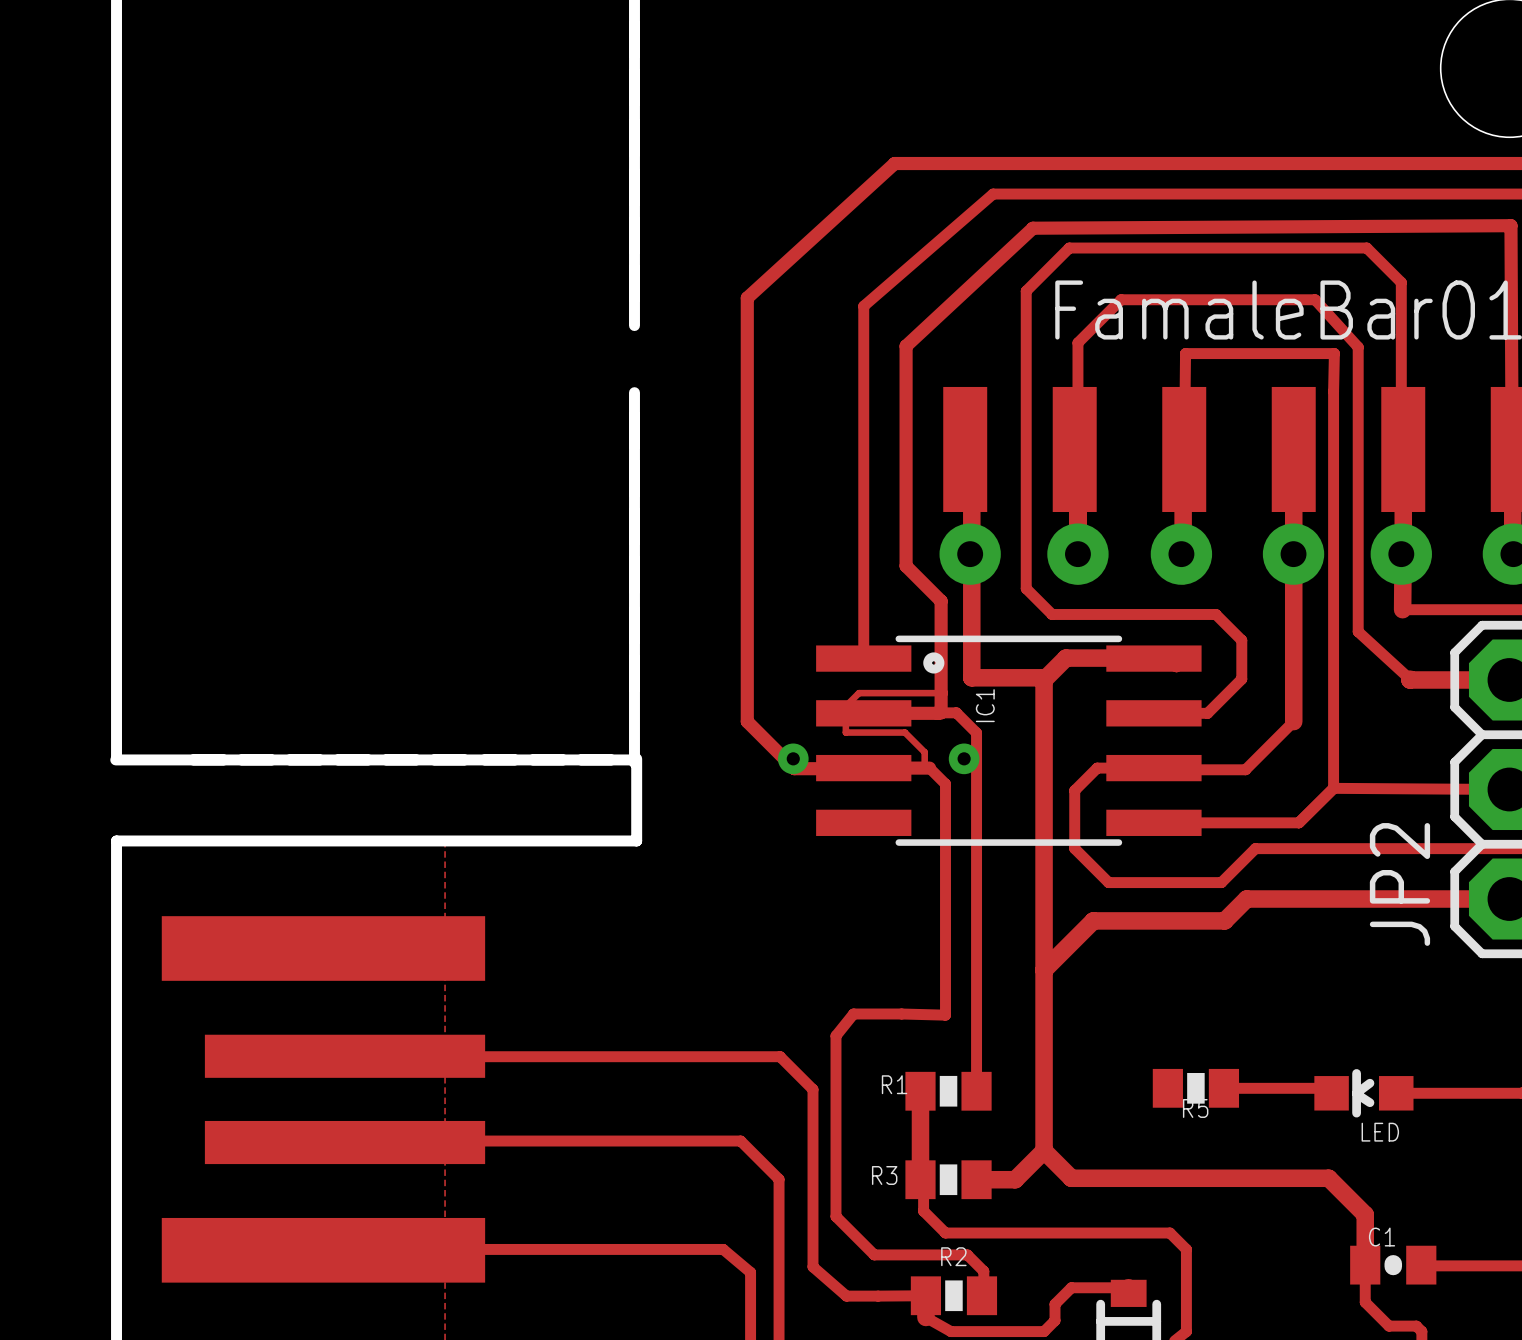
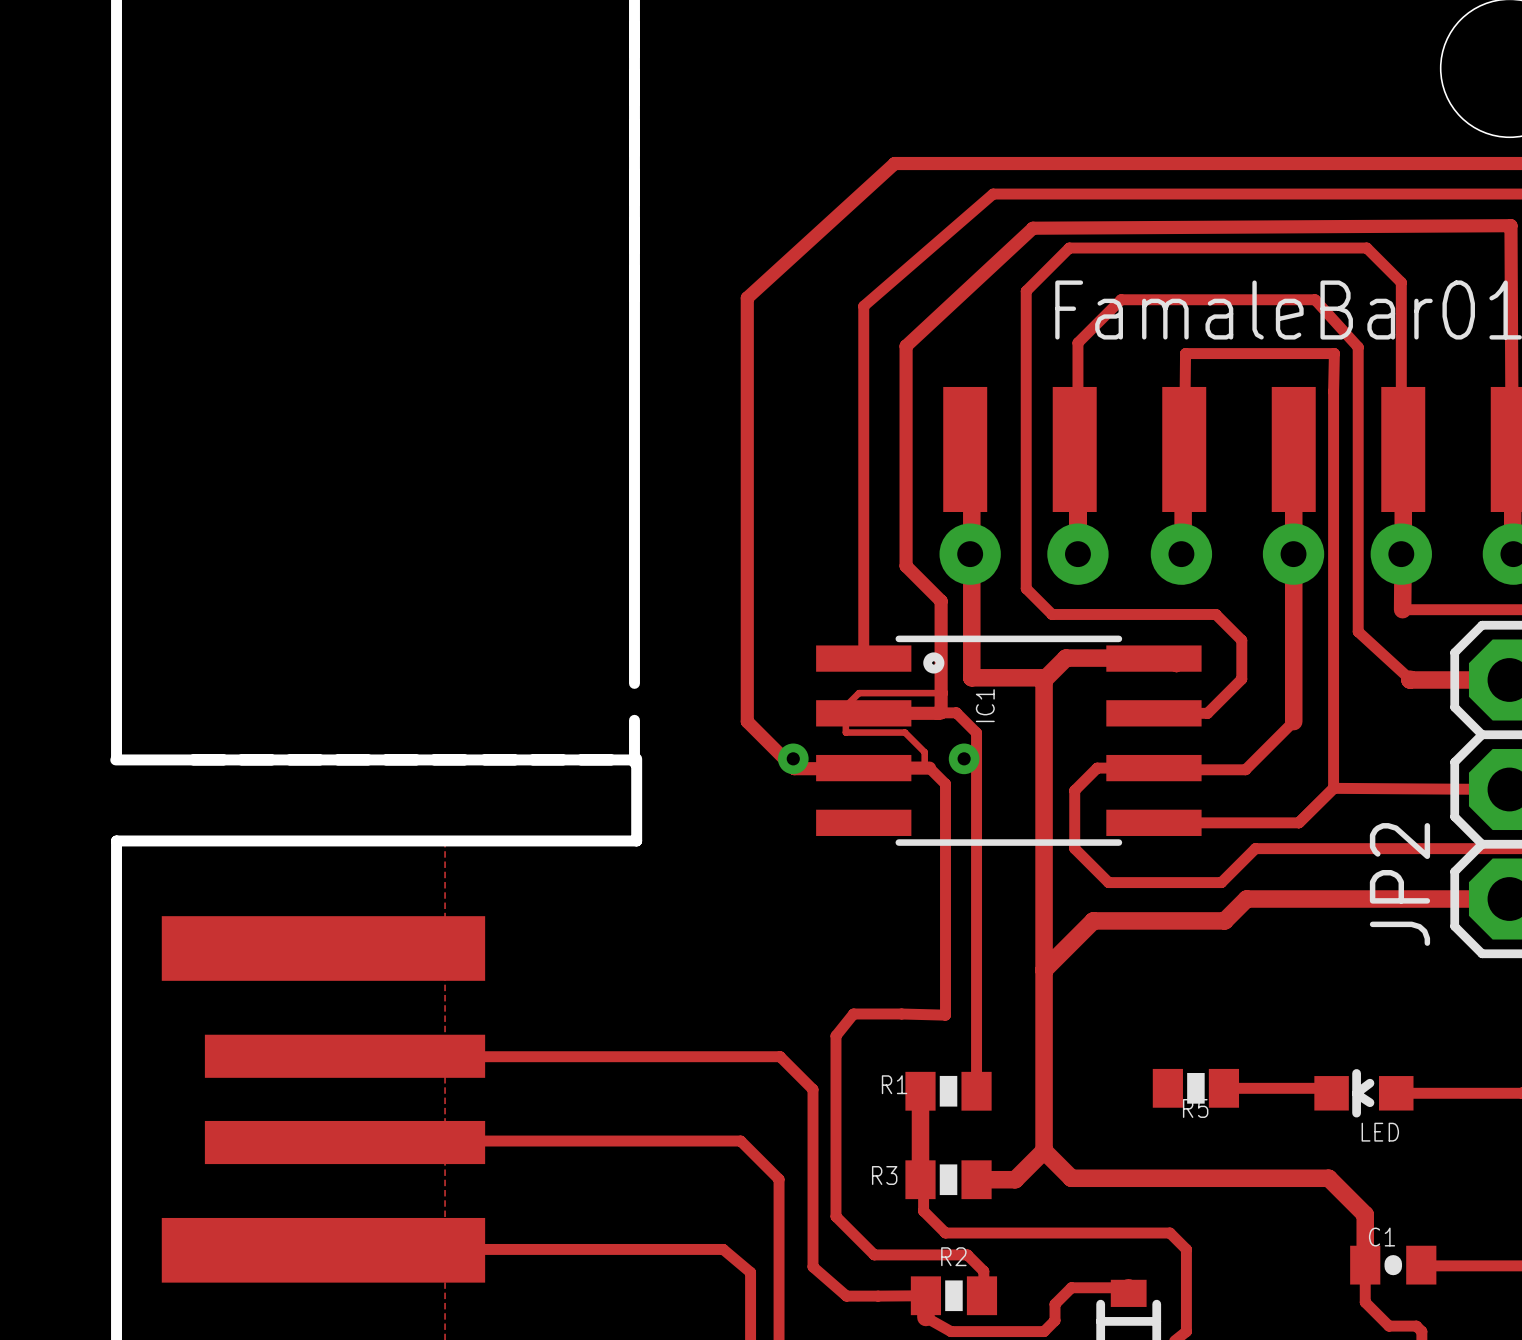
board edge: none -> (634, 325) (634, 392)
board edge: (634, 683) (634, 720) -> none

